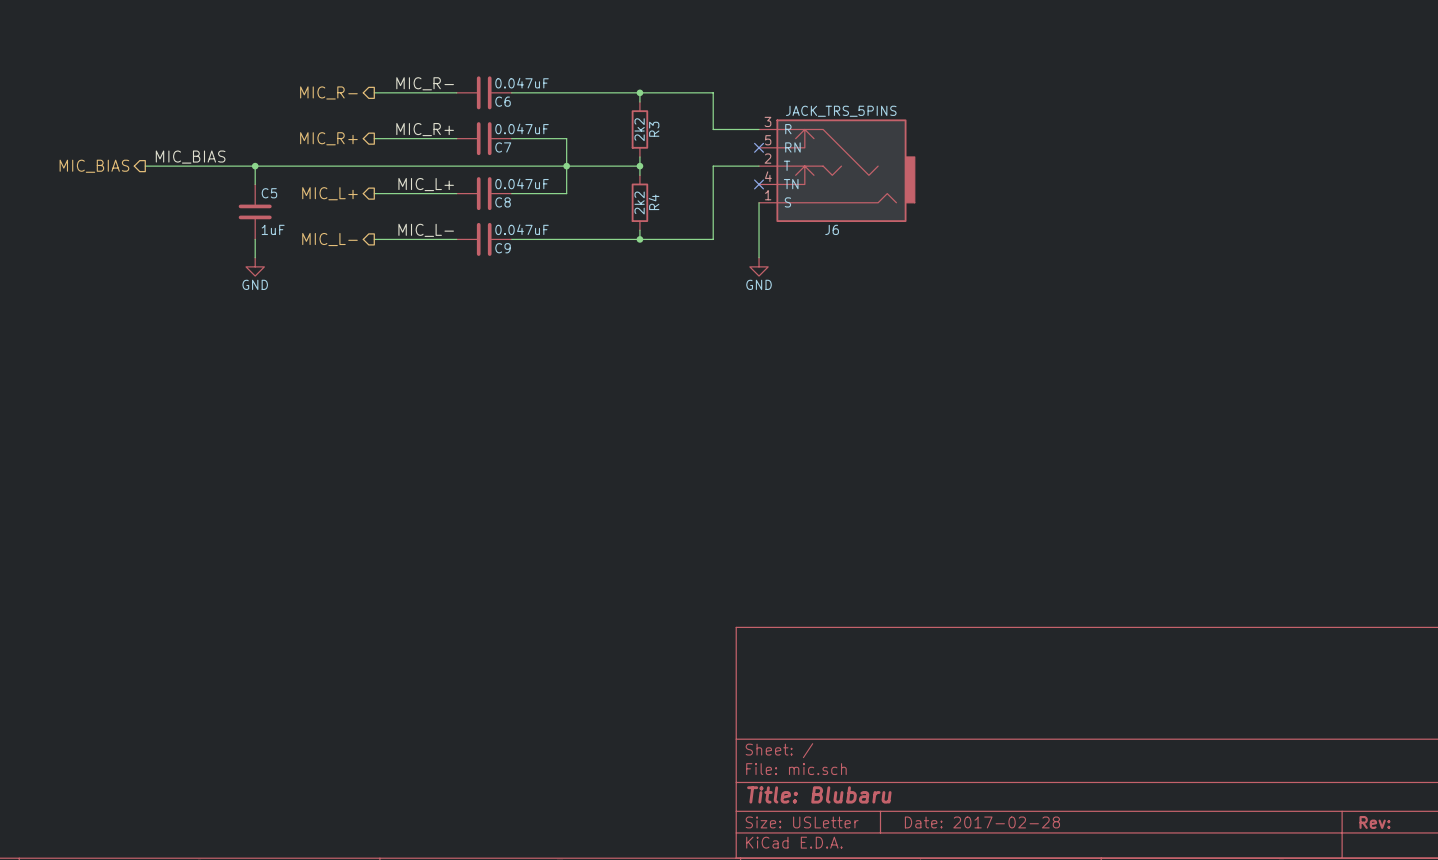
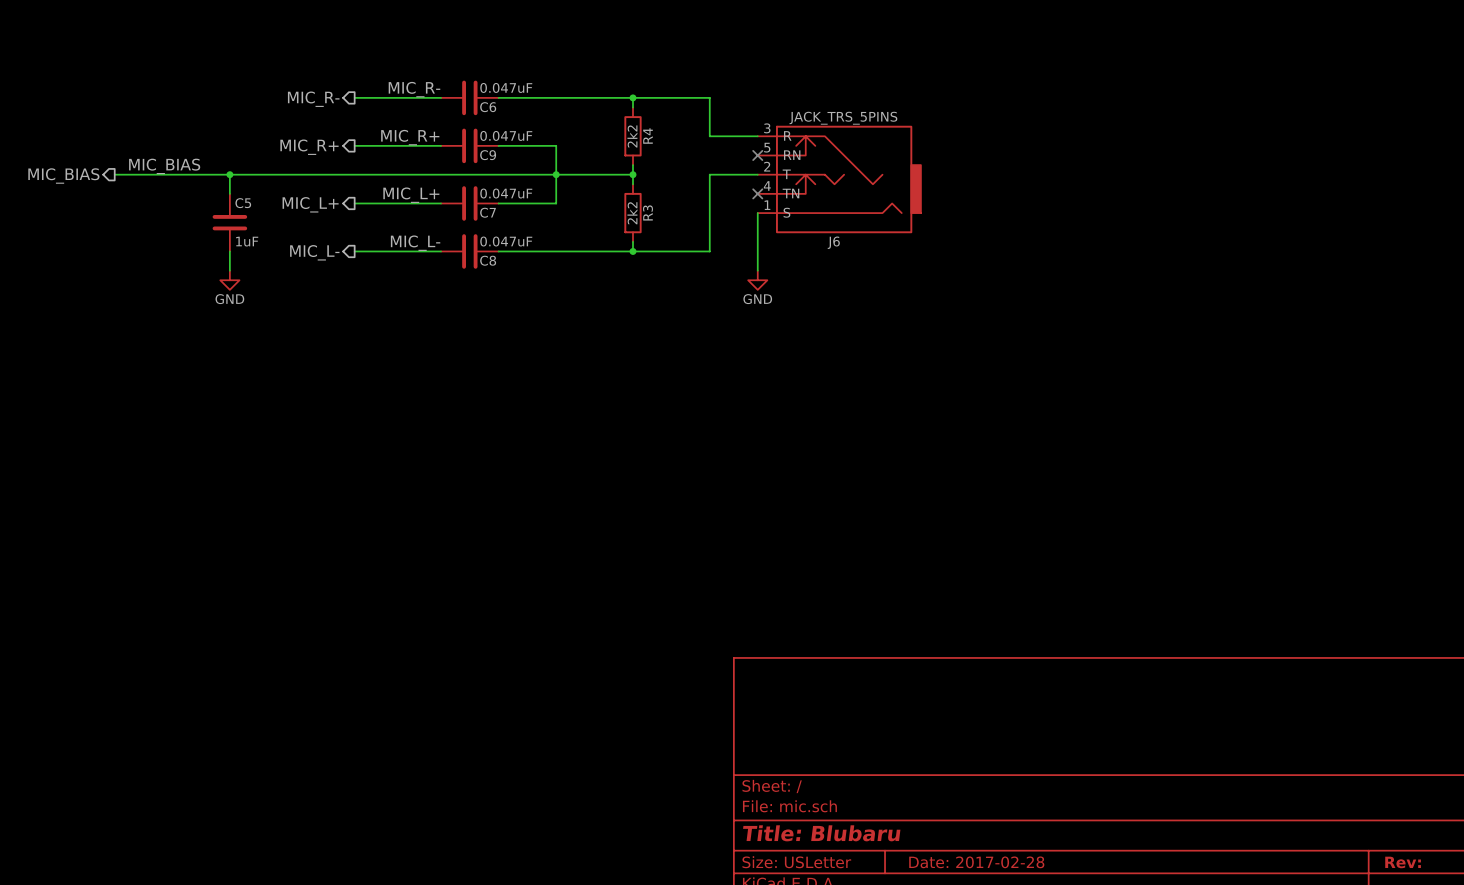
R3 name: R3 (654, 129) -> R4 (647, 136)
C7 name: C7 (503, 147) -> C9 (488, 155)
C8 name: C8 (503, 202) -> C7 (488, 212)
R4 name: R4 (654, 202) -> R3 (647, 212)
C9 name: C9 (503, 248) -> C8 (488, 260)

